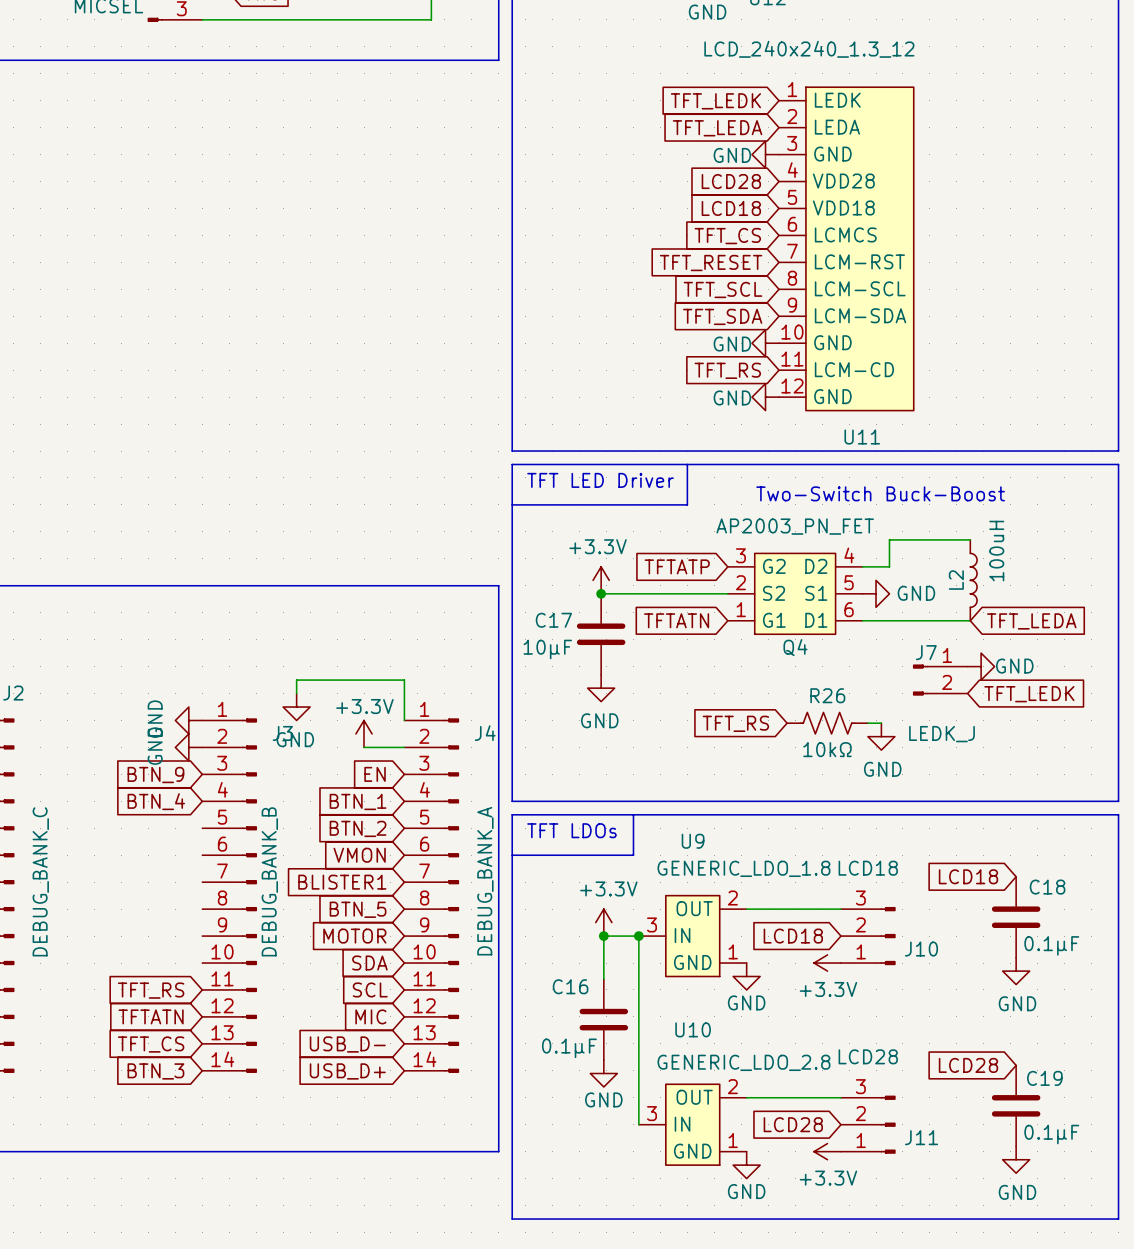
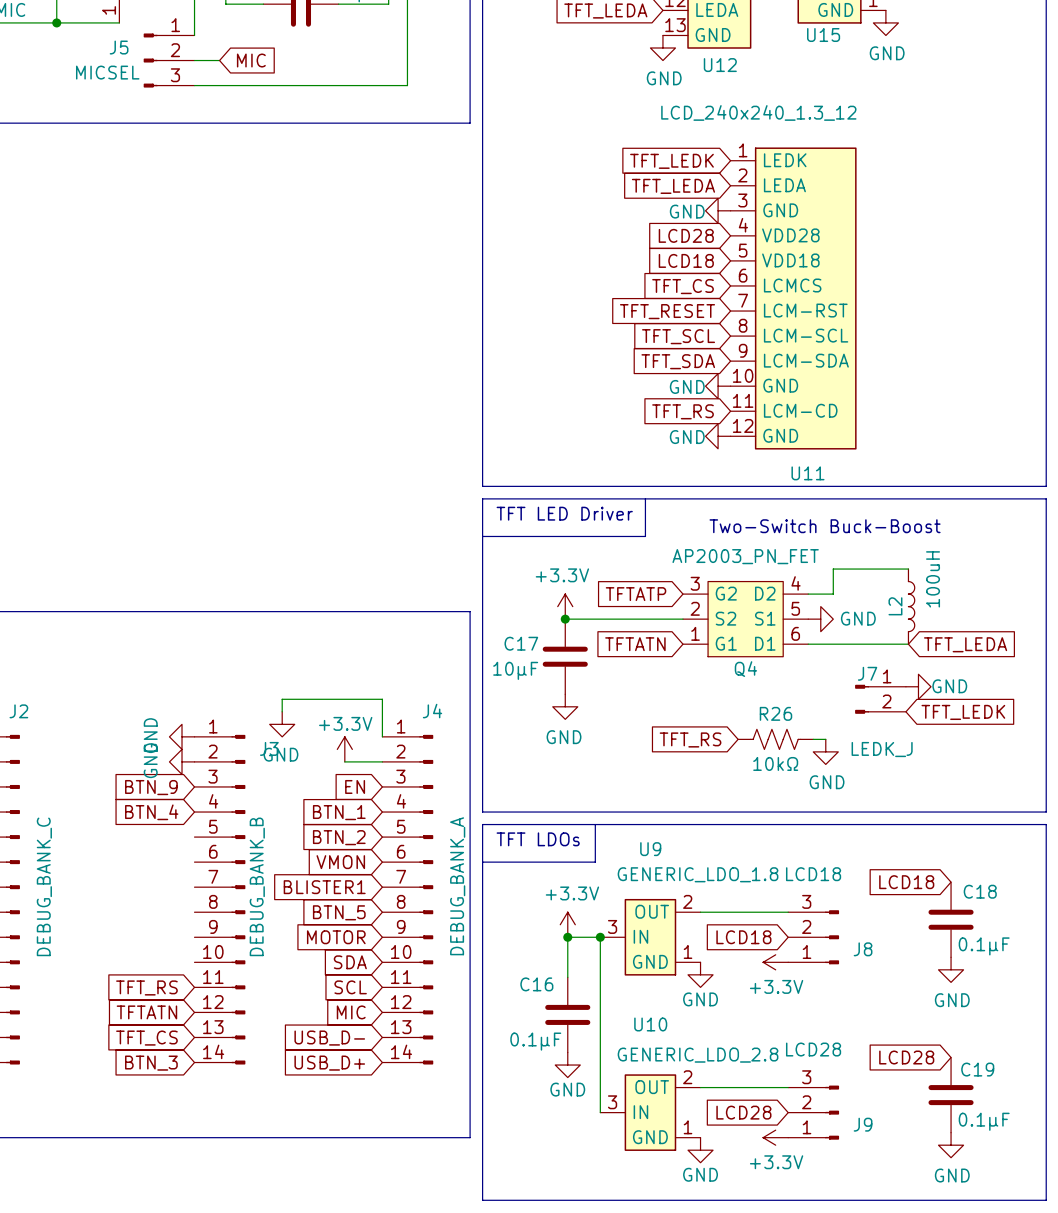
J4 name position: J4 (485, 733) -> J4 (432, 711)
J10 name: J10 (921, 949) -> J8 (863, 949)
J11 name: J11 (921, 1137) -> J9 (863, 1124)

